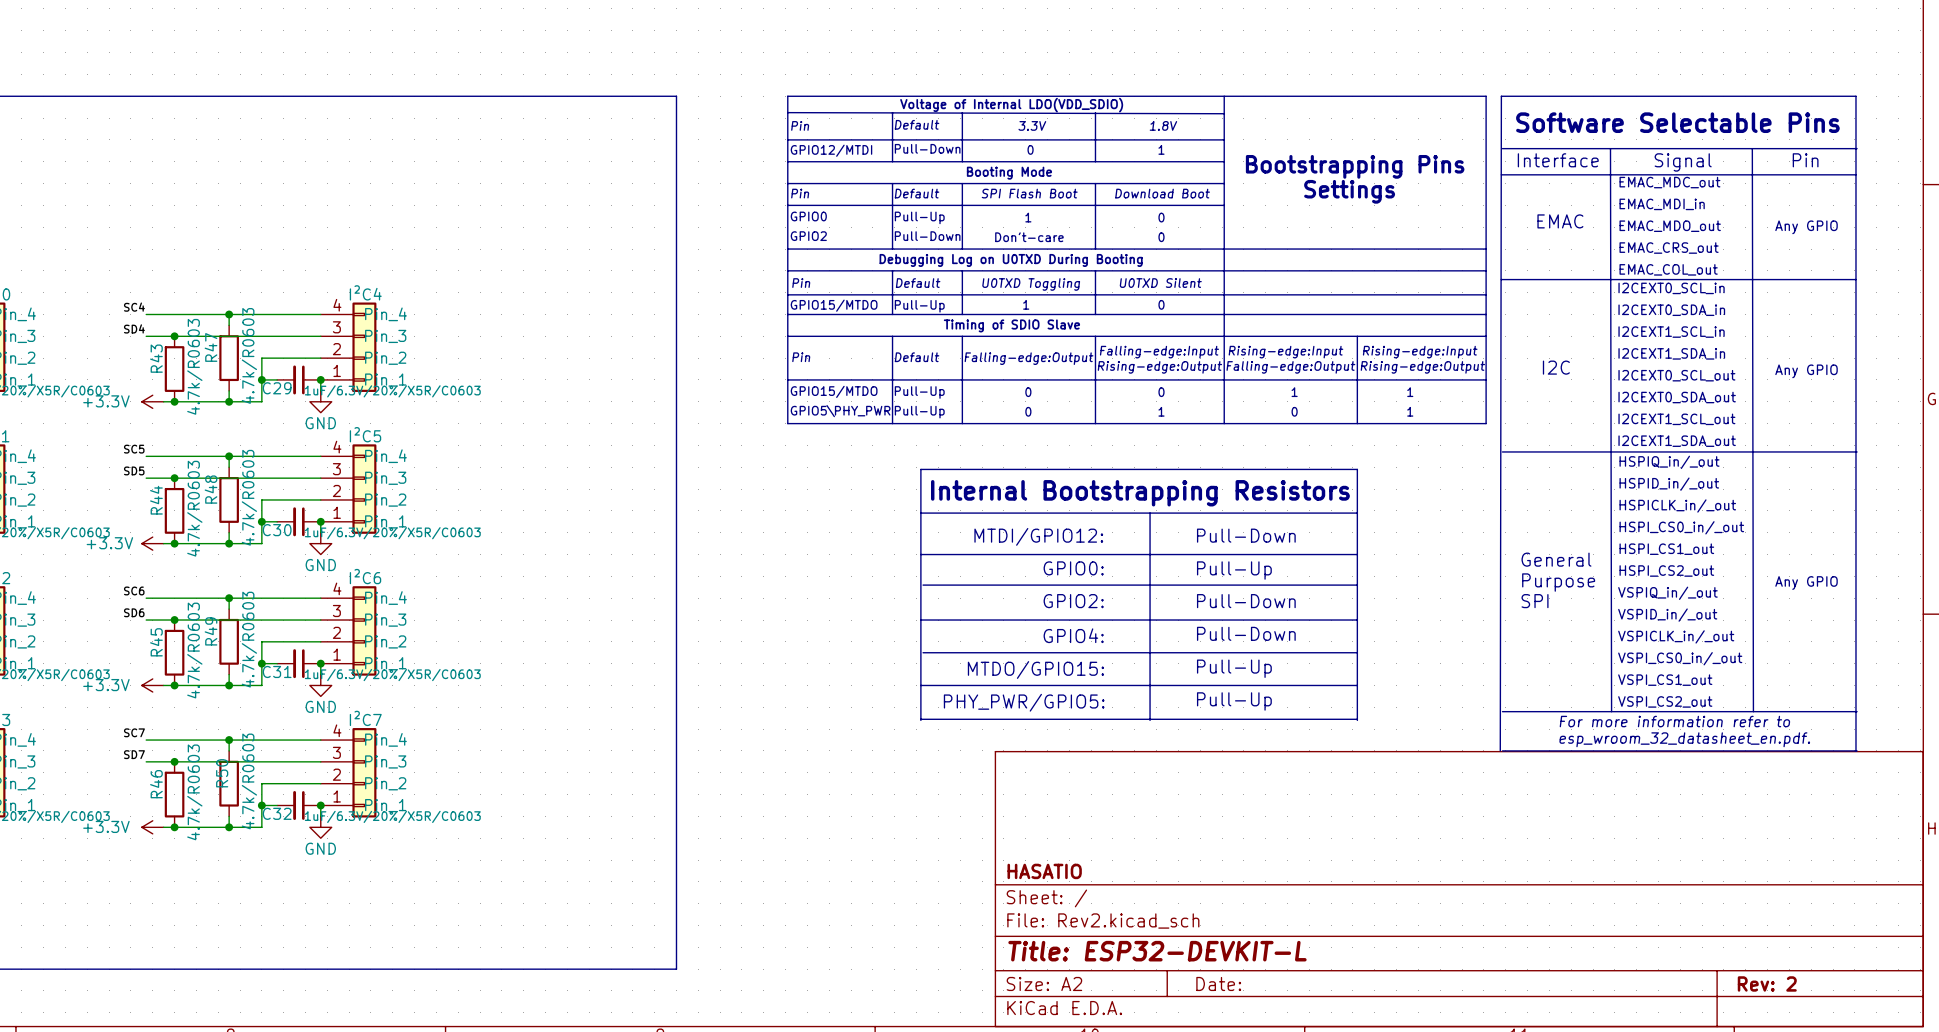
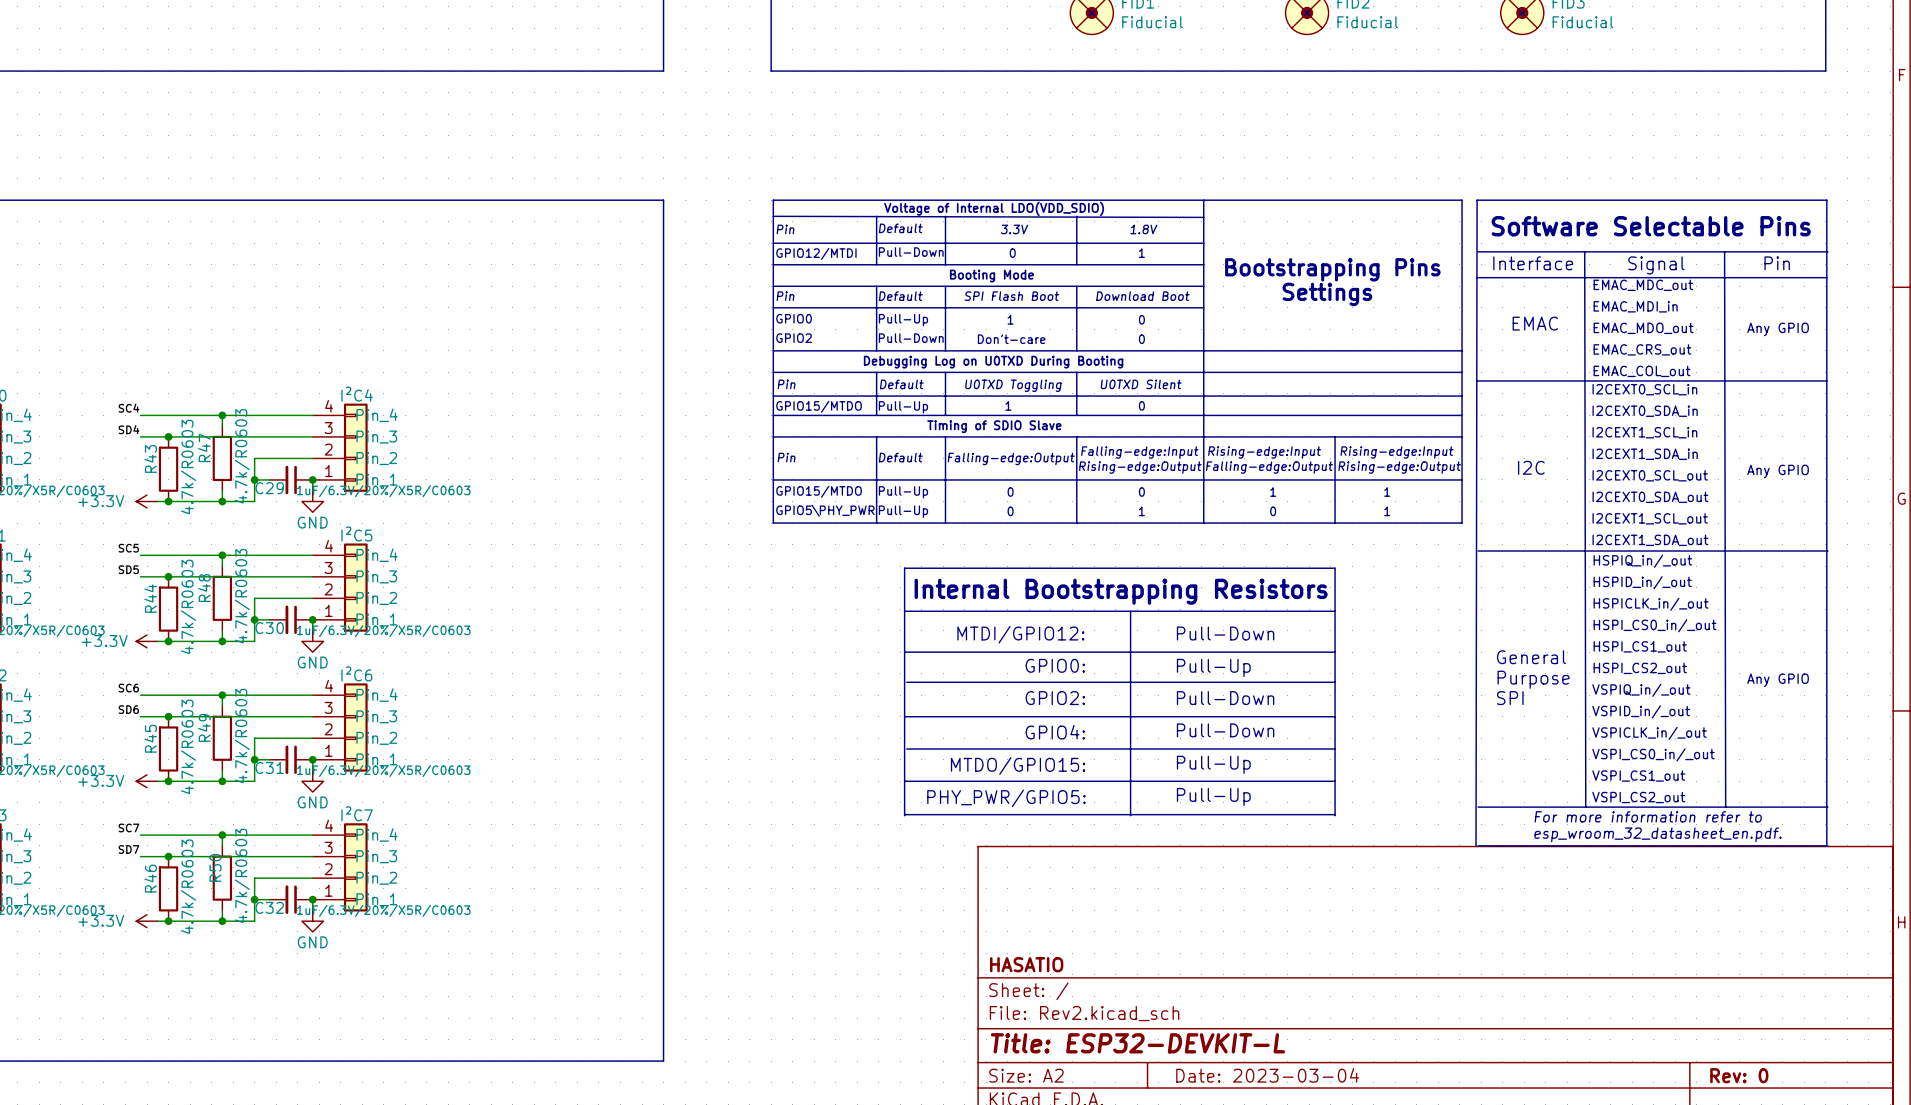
title block: Date: (1218, 983) -> Date: 2023-03-04 (1267, 1075)
title block: Rev: 2 (1767, 983) -> Rev: 0 (1739, 1075)

